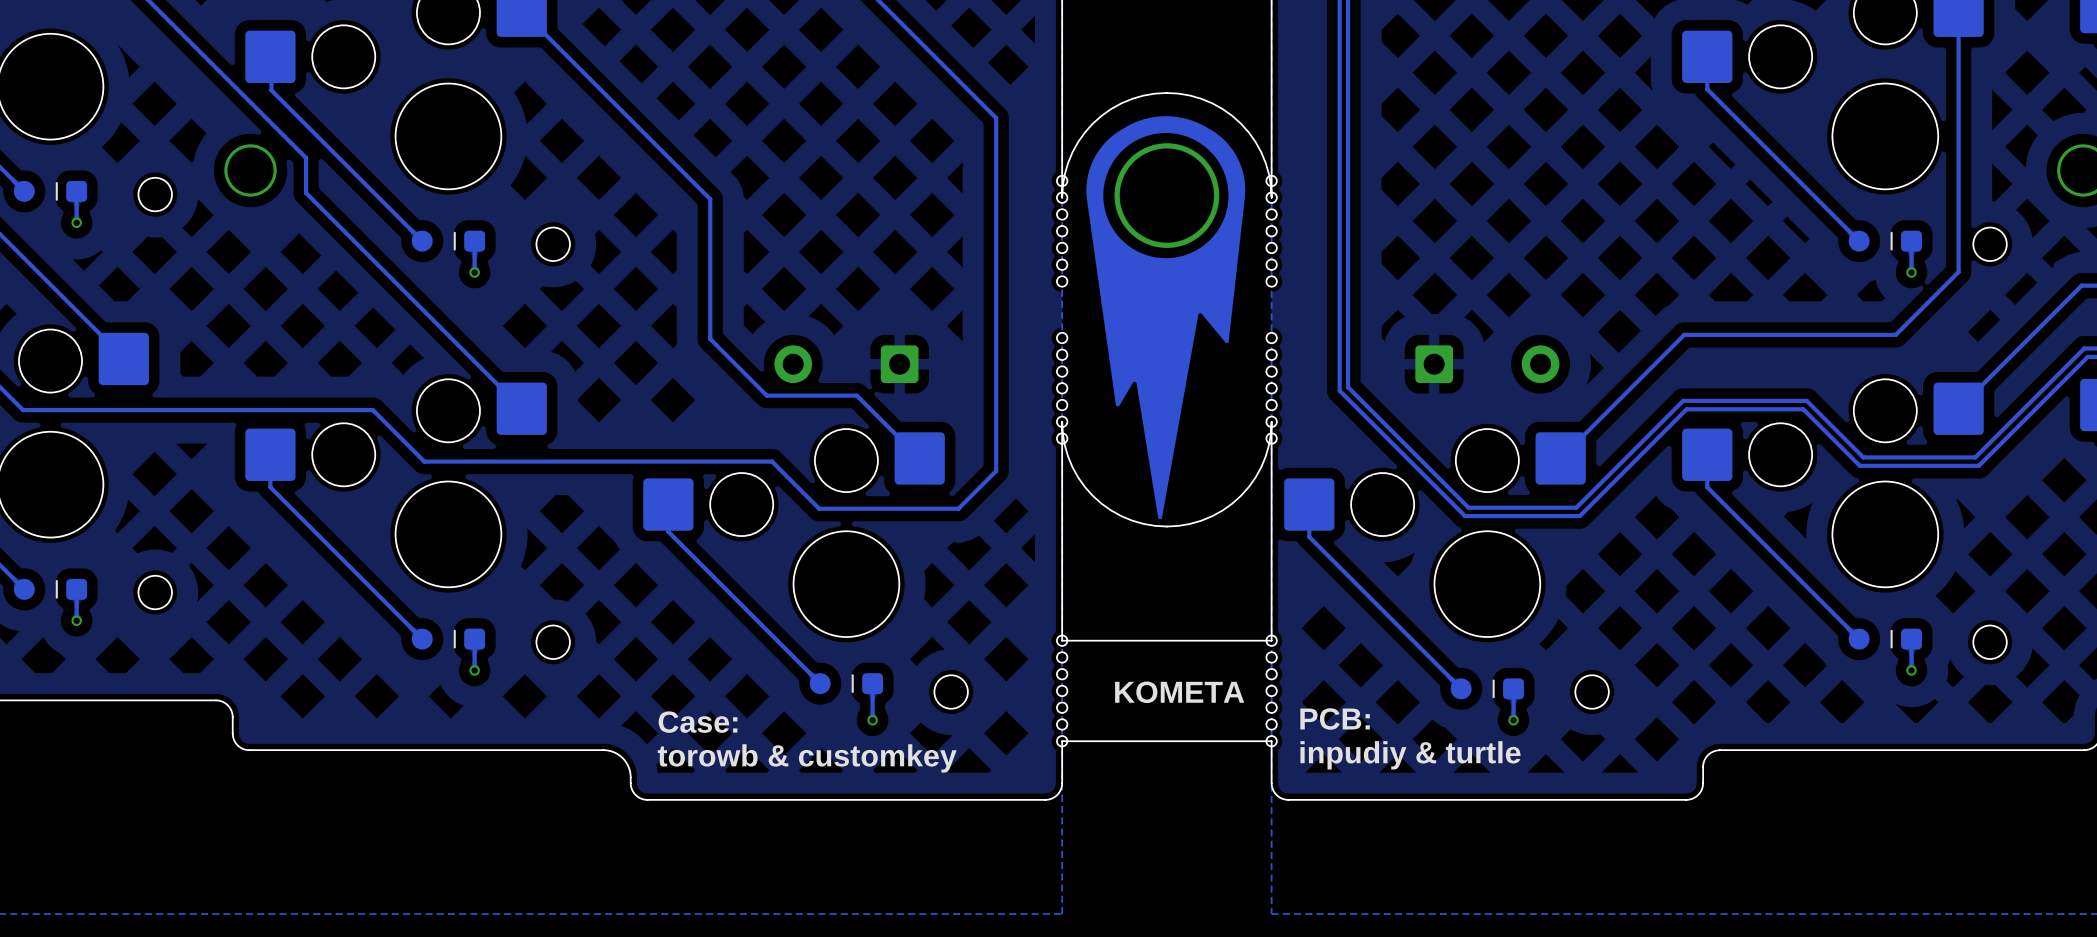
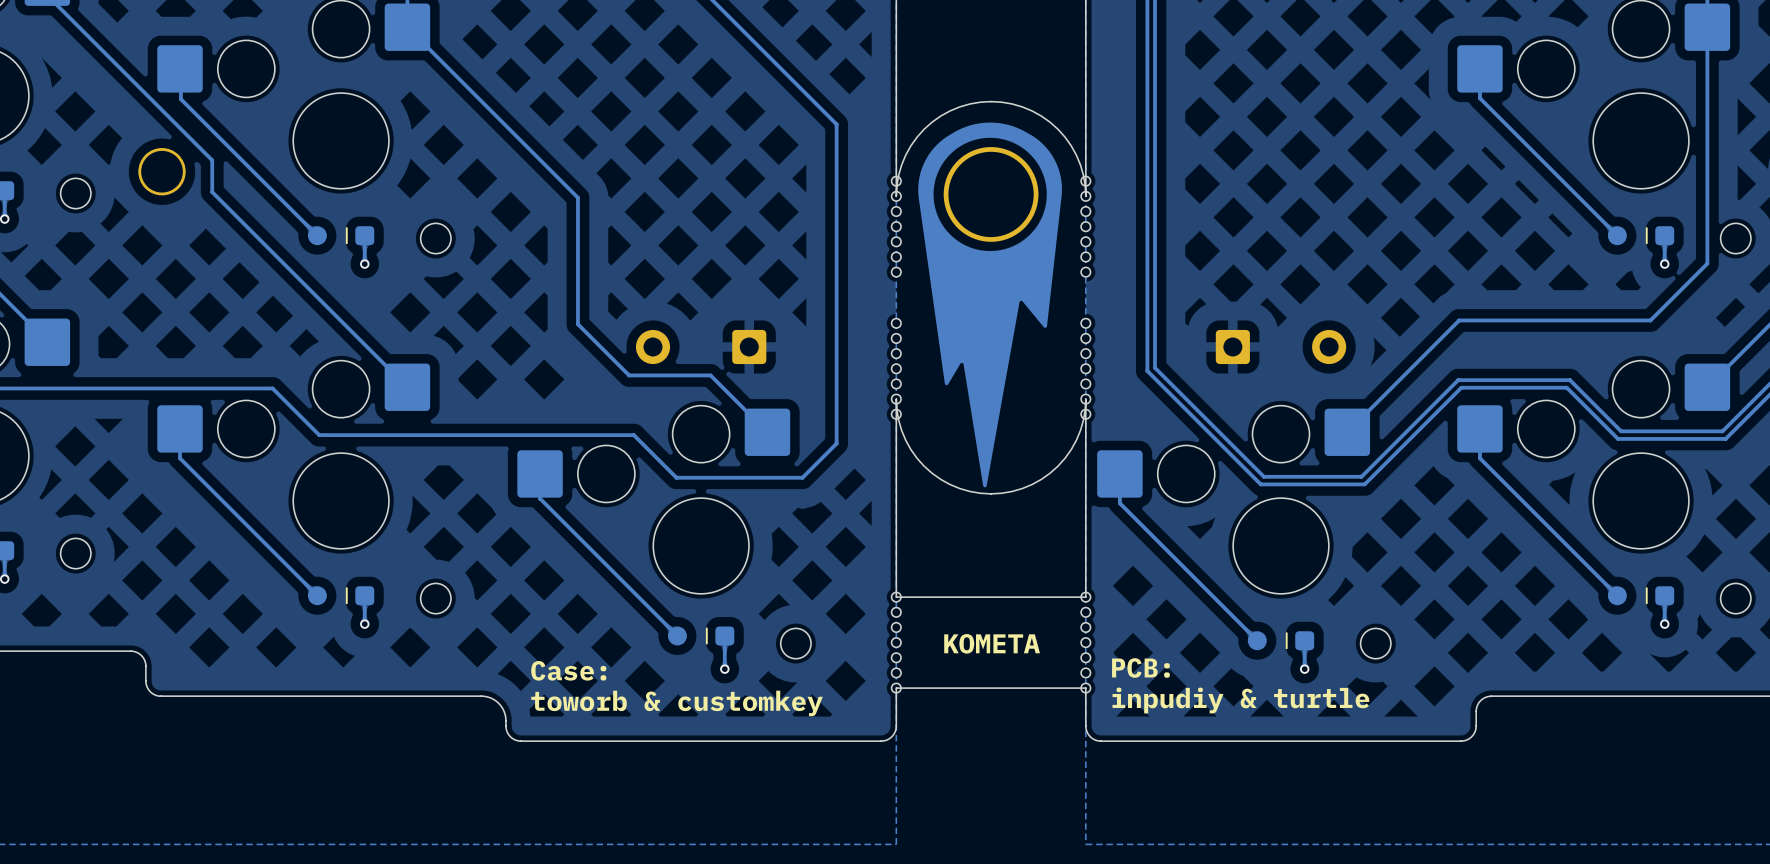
text: torowb & customkey (807, 758) -> toworb & customkey (677, 703)

